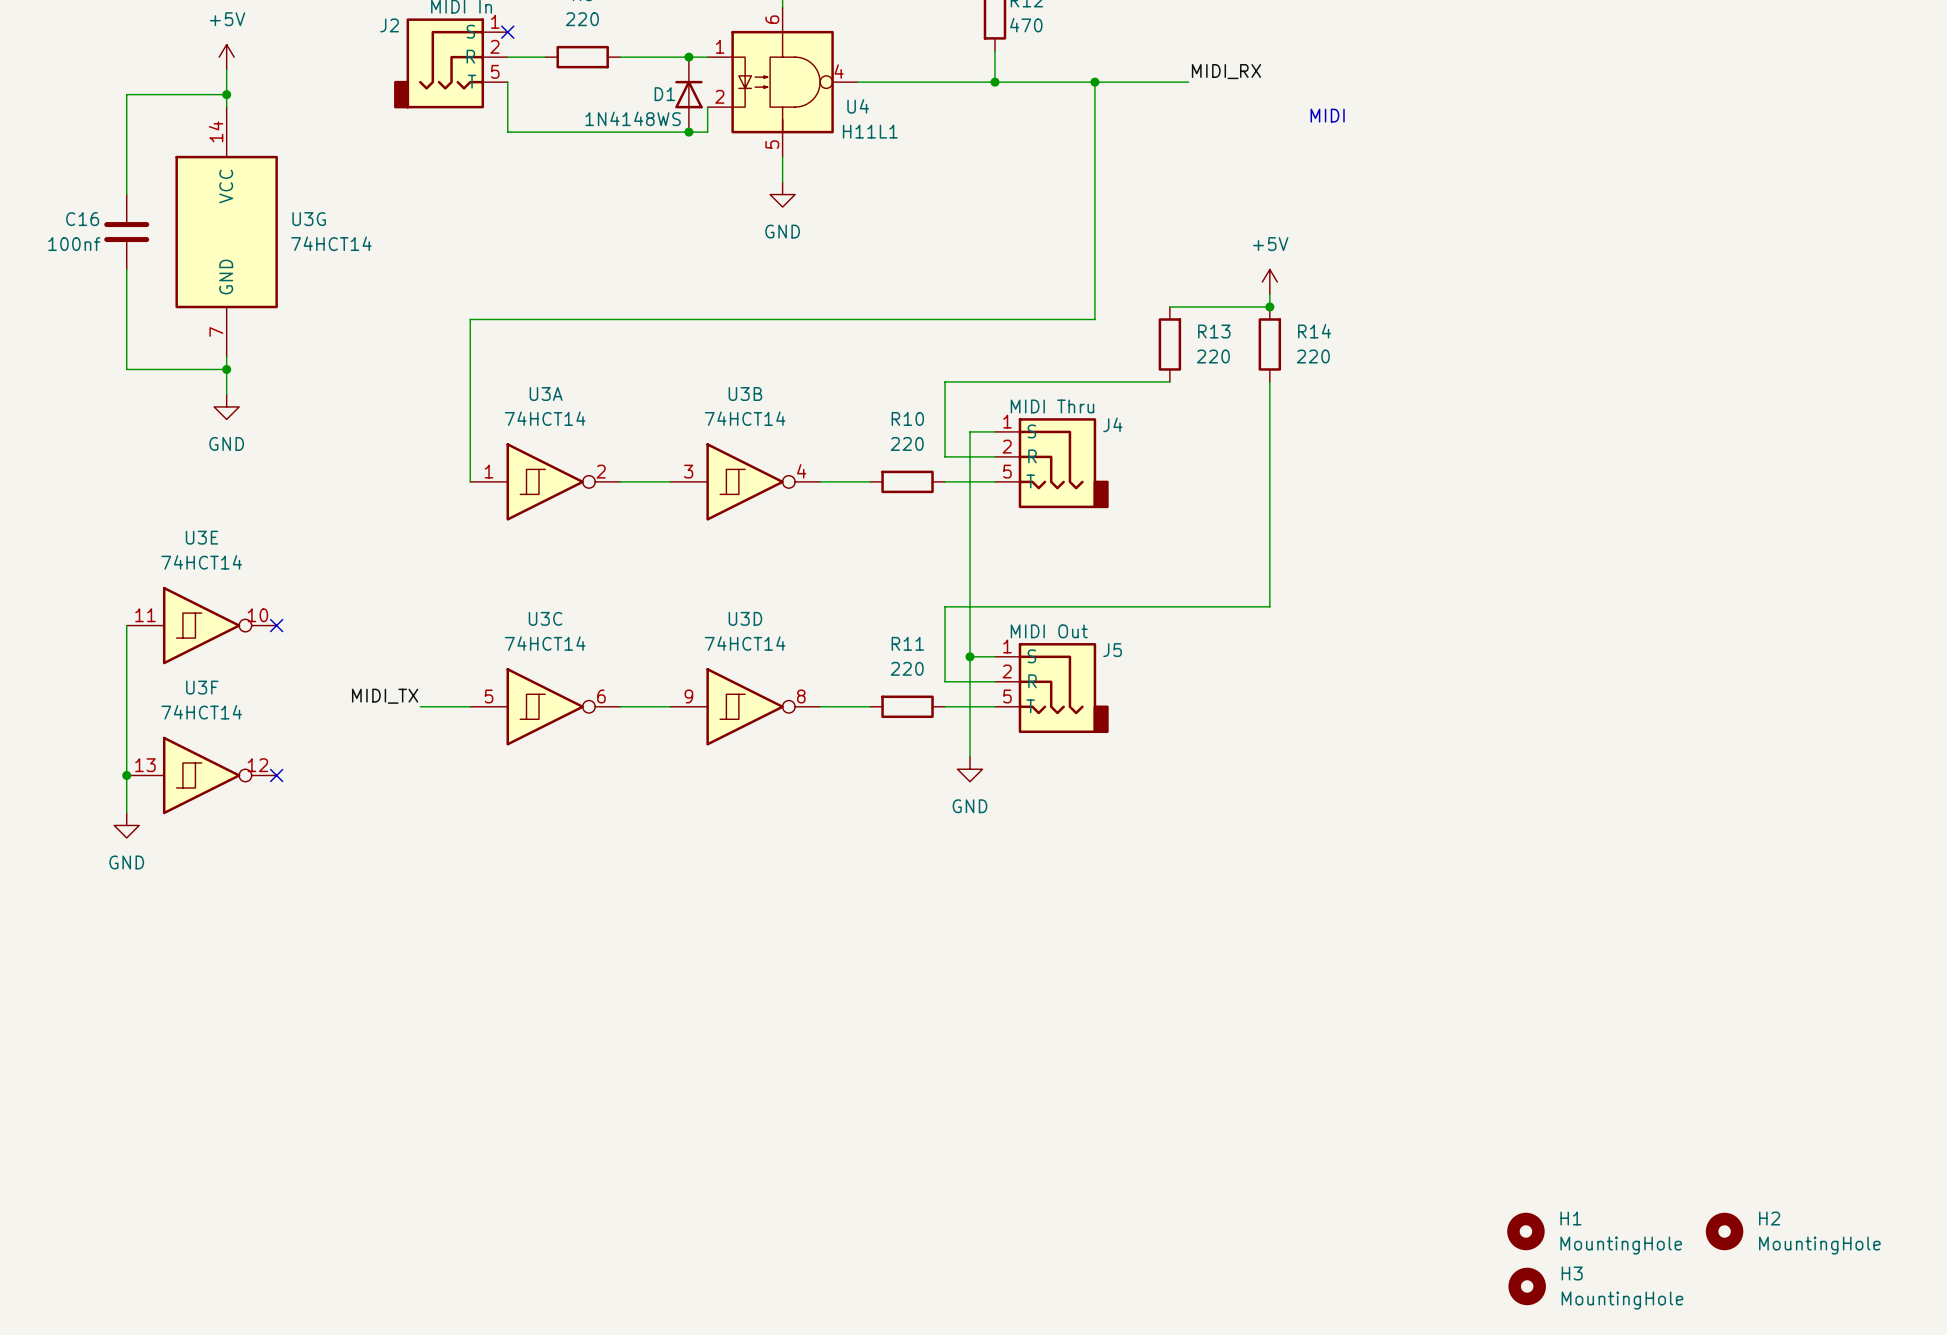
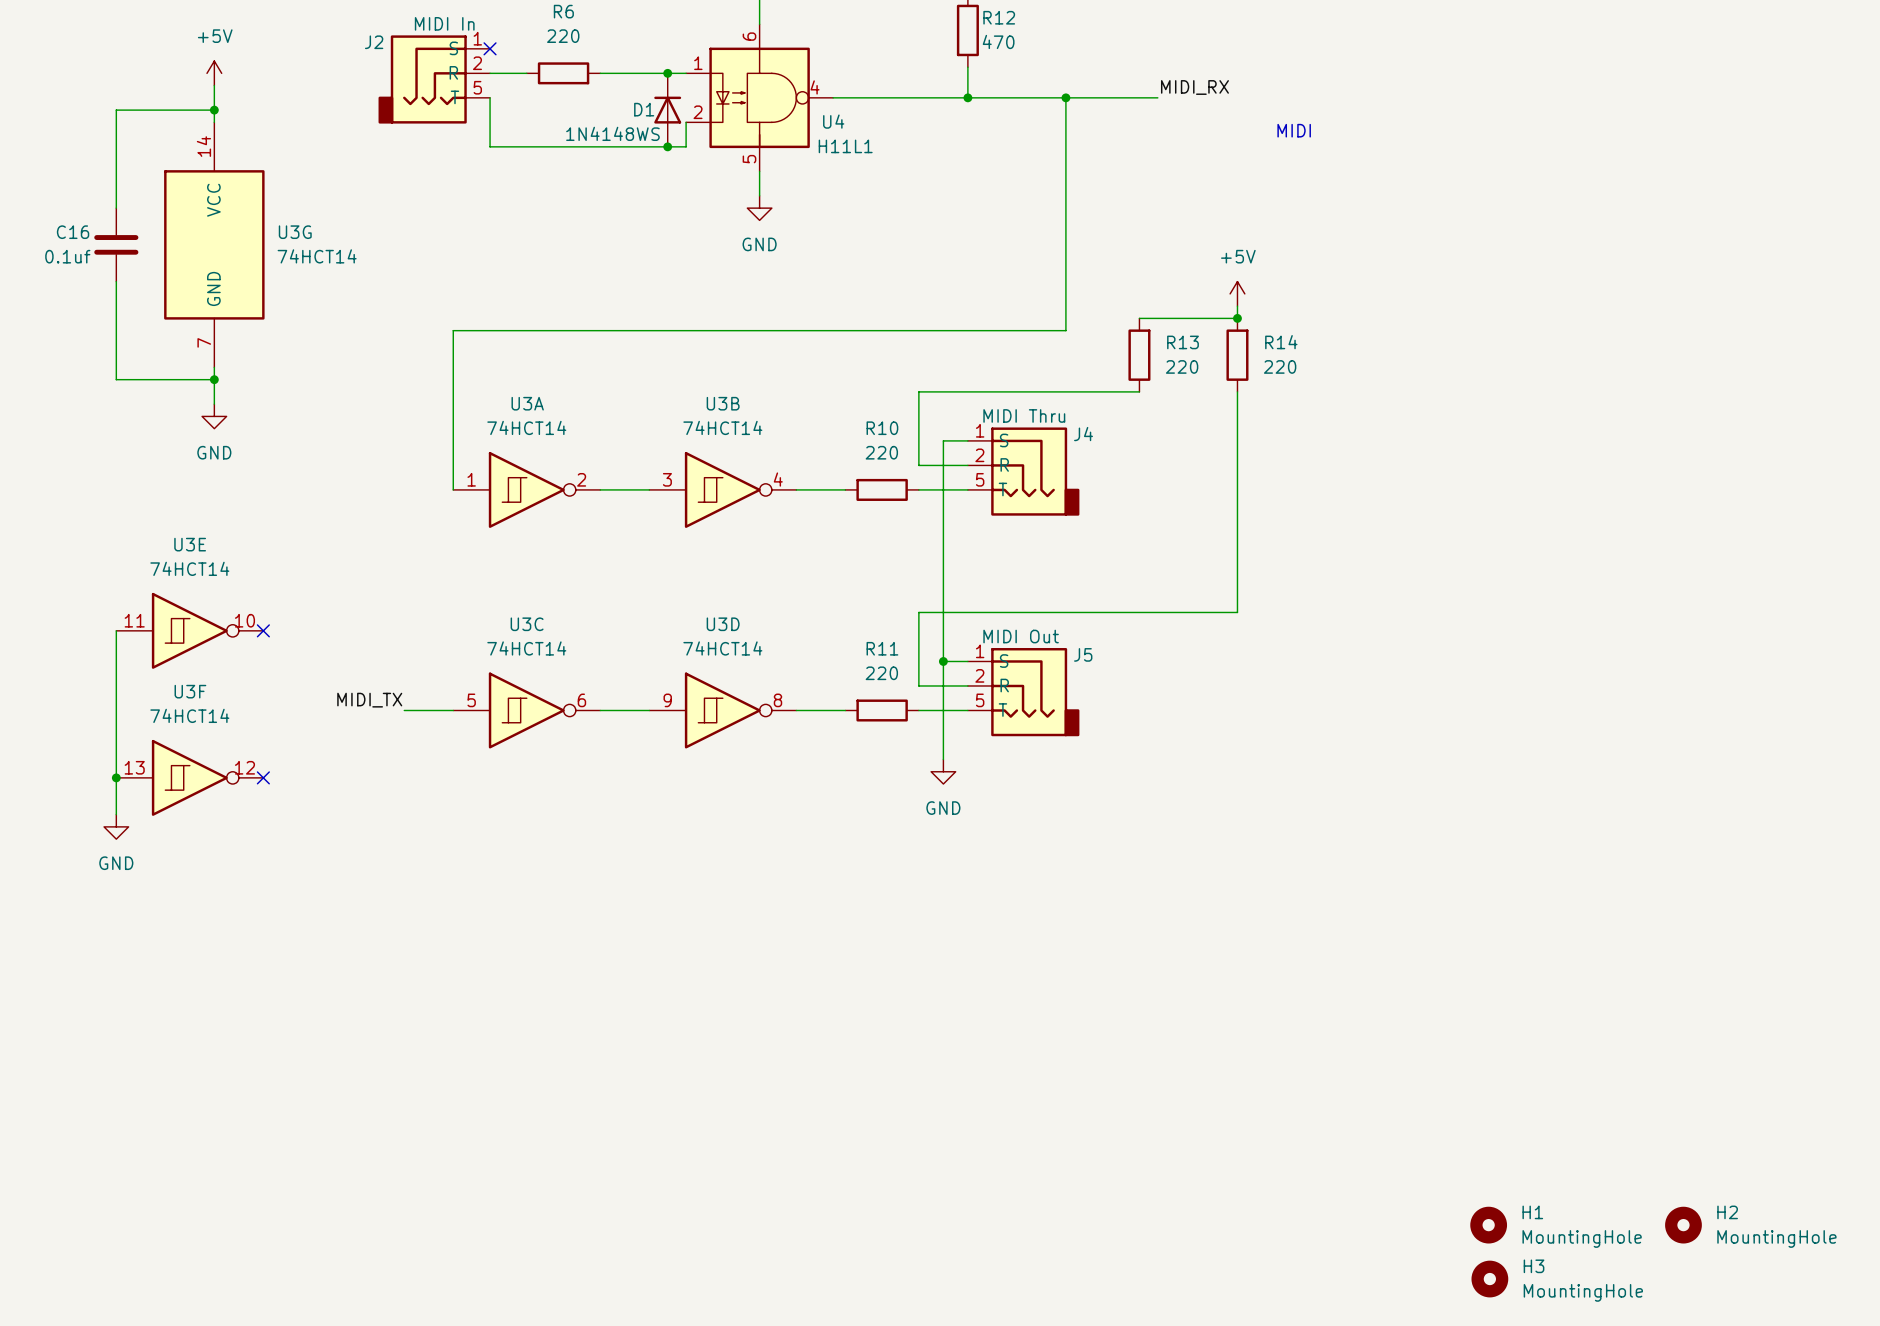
C16 value: 100nf (74, 244) -> 0.1uf (67, 256)

